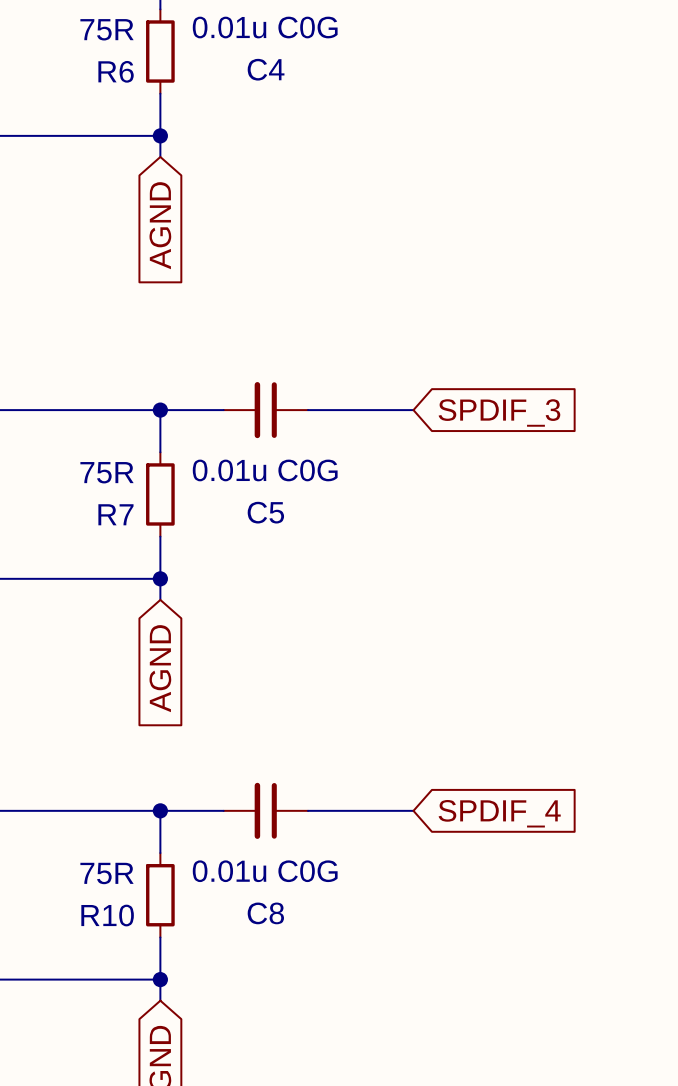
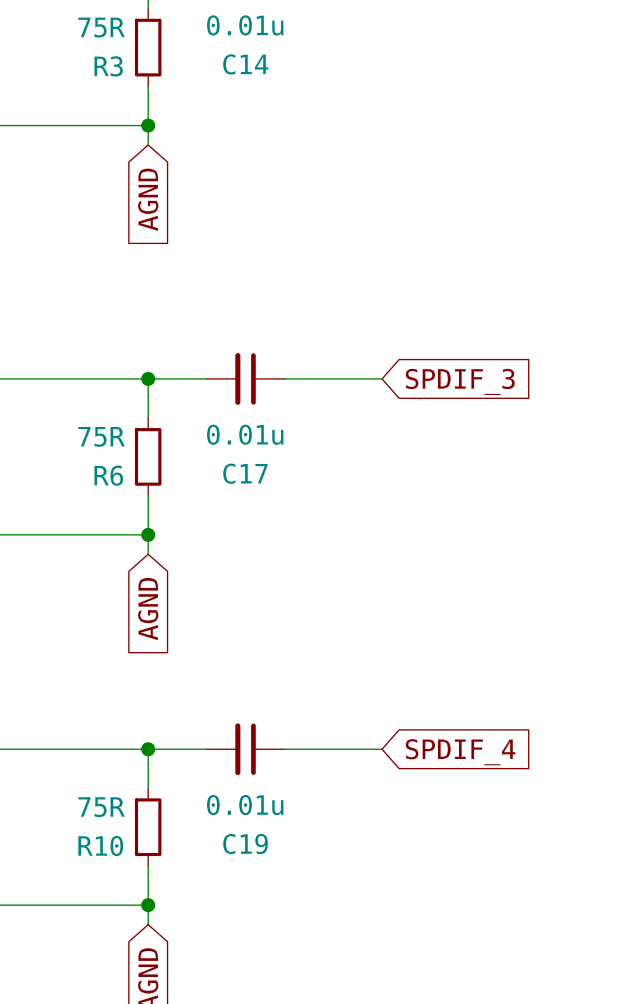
C4 value: 0.01u C0G (265, 27) -> 0.01u (245, 25)
C4 name: C4 (266, 69) -> C14 (245, 64)
R6 name: R6 (116, 71) -> R3 (108, 66)
C5 value: 0.01u C0G (265, 470) -> 0.01u (245, 434)
C5 name: C5 (265, 512) -> C17 (245, 473)
R7 name: R7 (115, 514) -> R6 (108, 475)
C8 value: 0.01u C0G (265, 871) -> 0.01u (245, 805)
C8 name: C8 (265, 913) -> C19 (245, 844)

